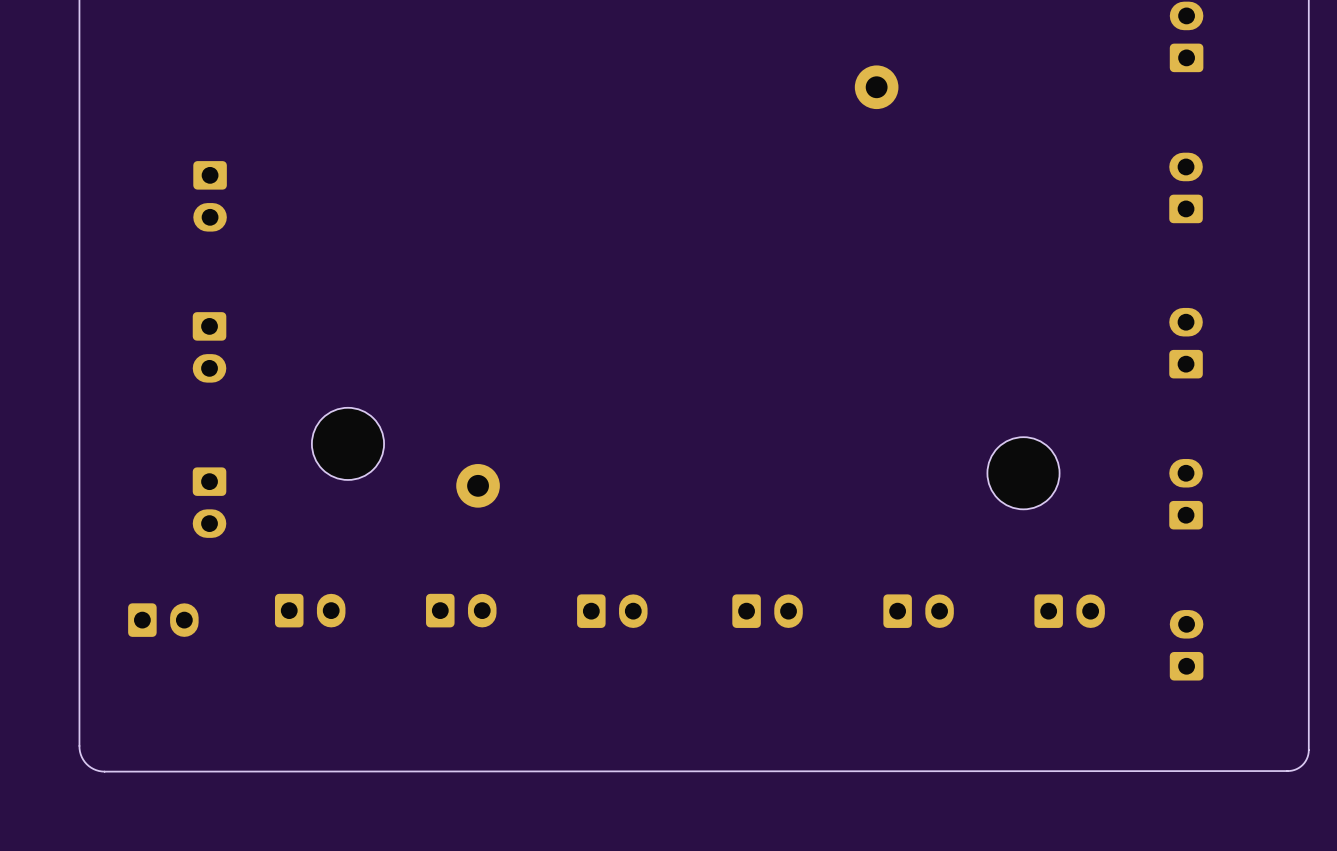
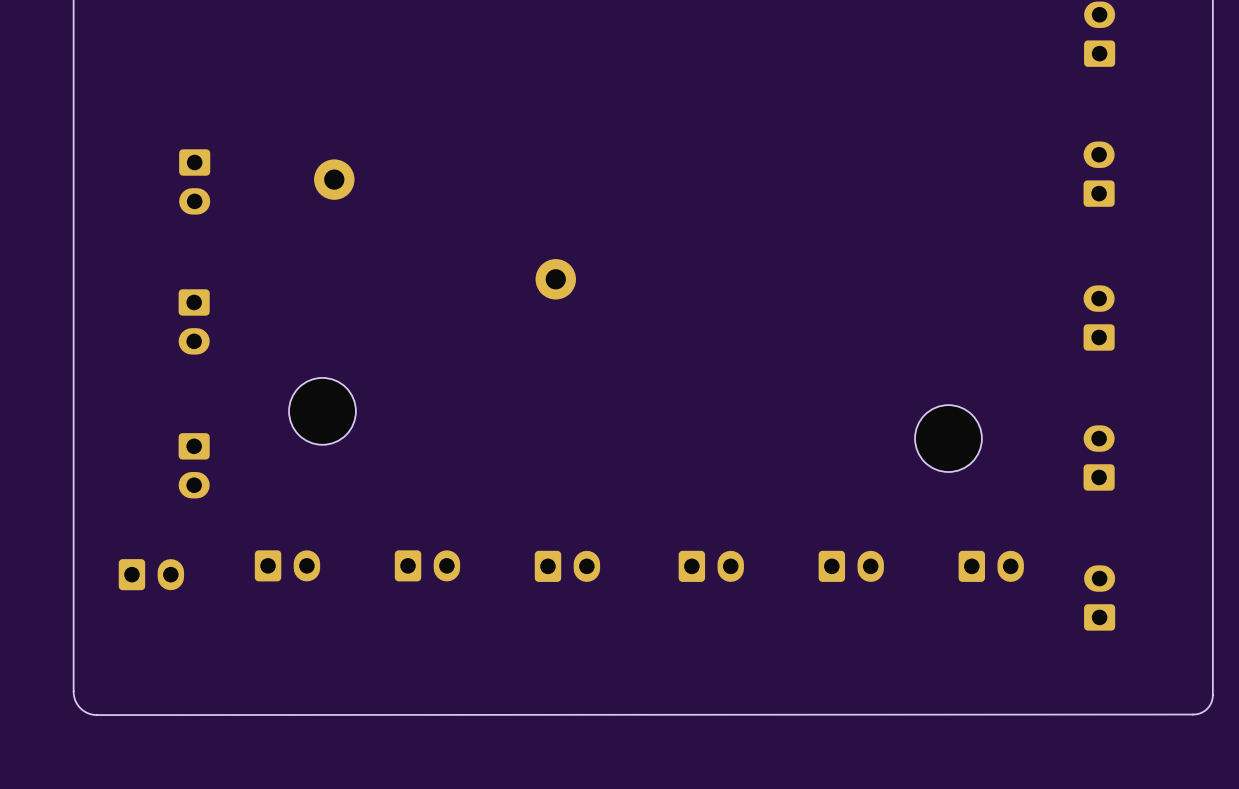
part: (876, 87) -> none
part: none -> (334, 179)
part: none -> (555, 279)
part: (478, 485) -> none

